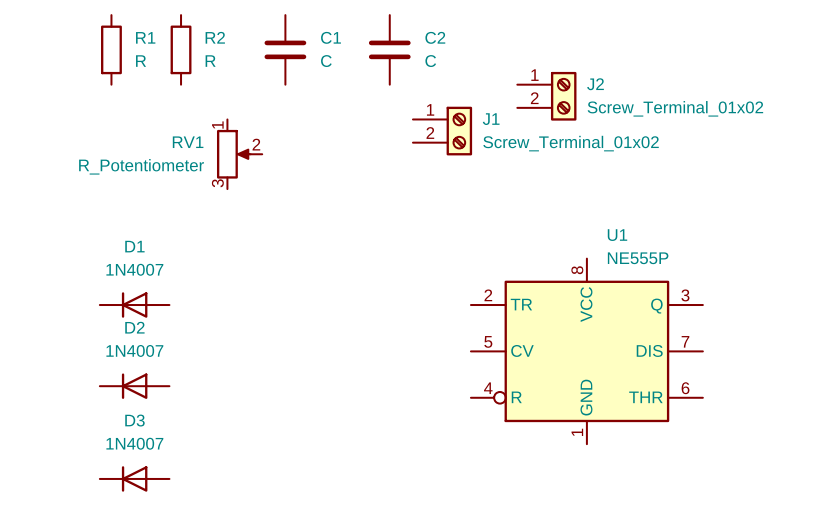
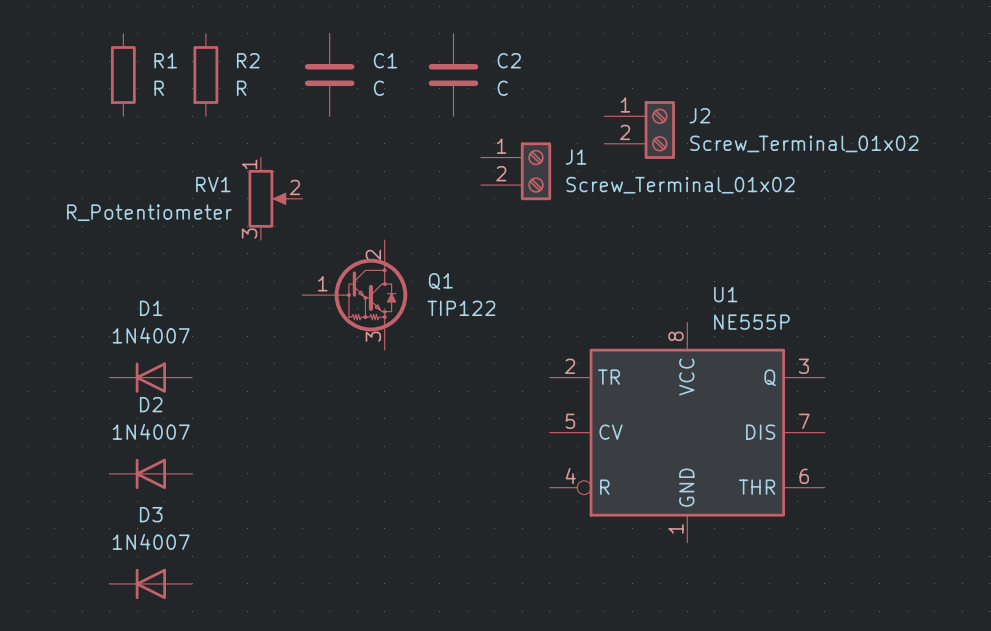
Q1: none -> TIP122 (354, 295)

